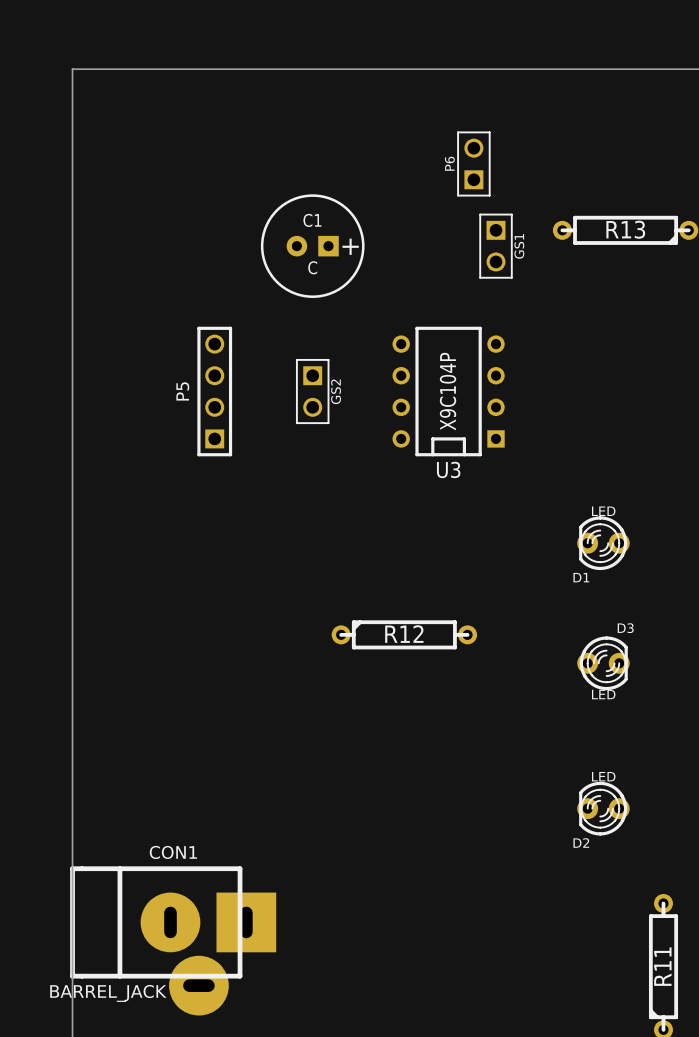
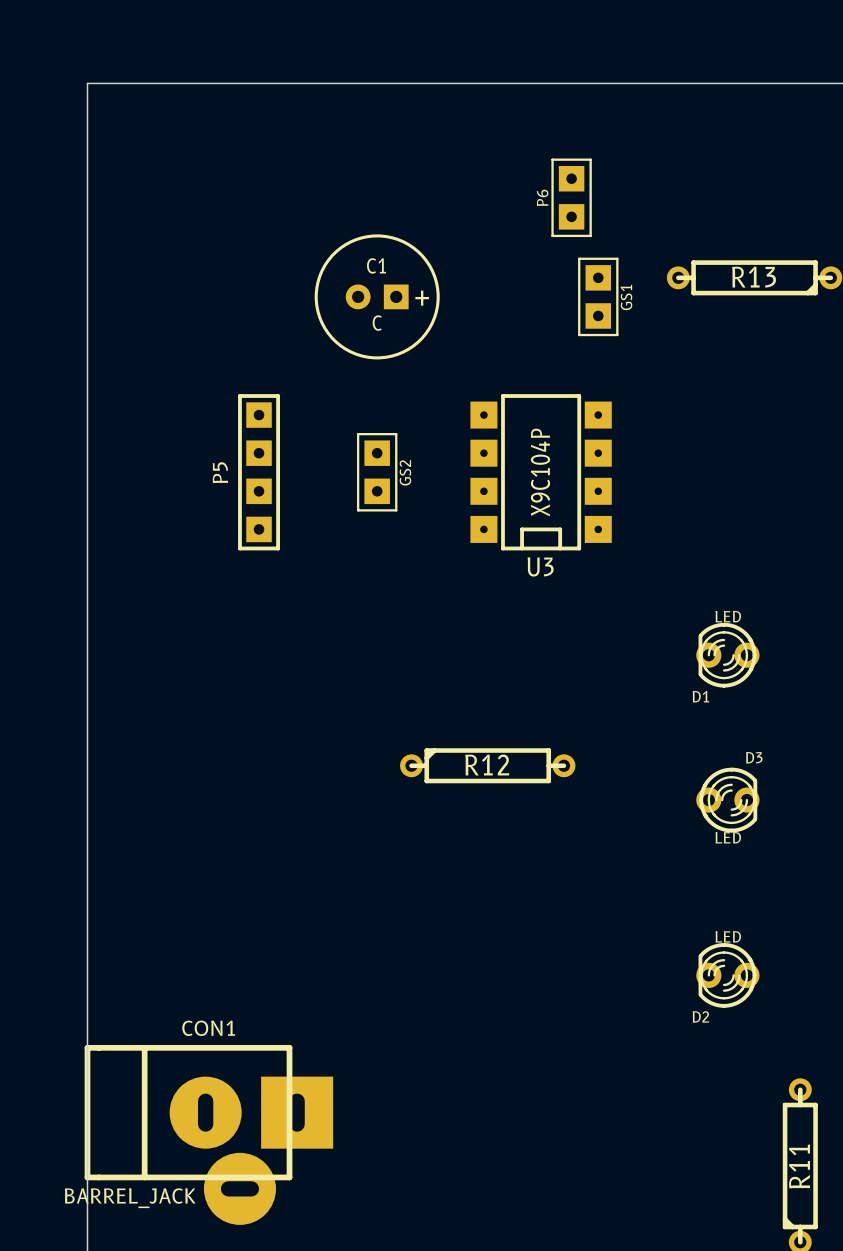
P6 footprint: [457, 131, 491, 197] -> [551, 158, 592, 238]
GS1 footprint: [479, 213, 513, 279] -> [578, 257, 619, 337]
P5 footprint: [197, 326, 233, 457] -> [238, 394, 280, 551]
U3 footprint: [392, 326, 505, 457] -> [470, 394, 612, 551]
GS2 footprint: [295, 358, 330, 425] -> [356, 432, 398, 512]

